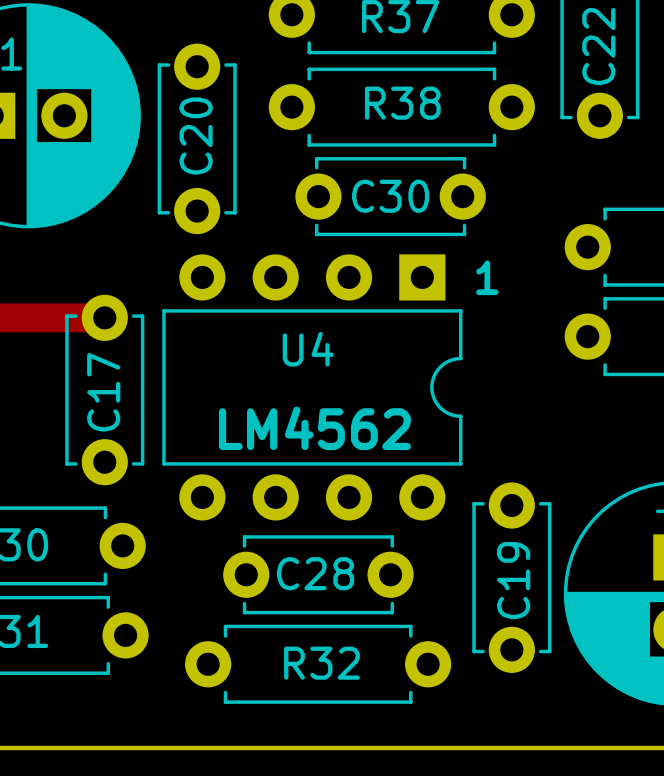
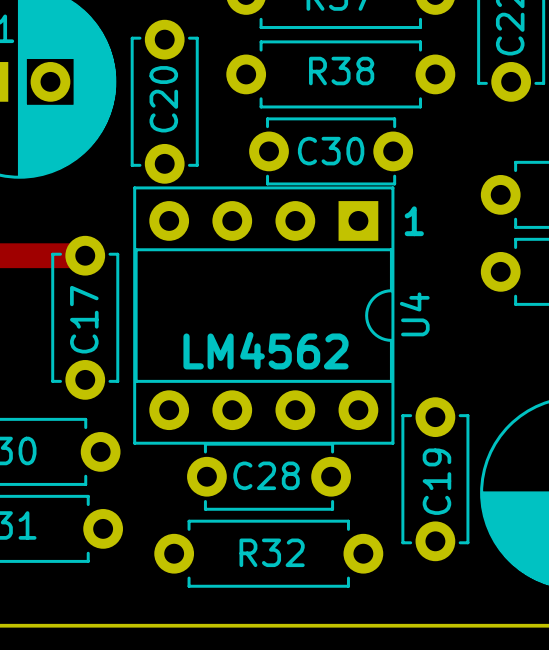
U4 footprint: [162, 254, 463, 521] -> [133, 186, 395, 445]
U4 name position: U4 (308, 349) -> U4 (414, 314)

